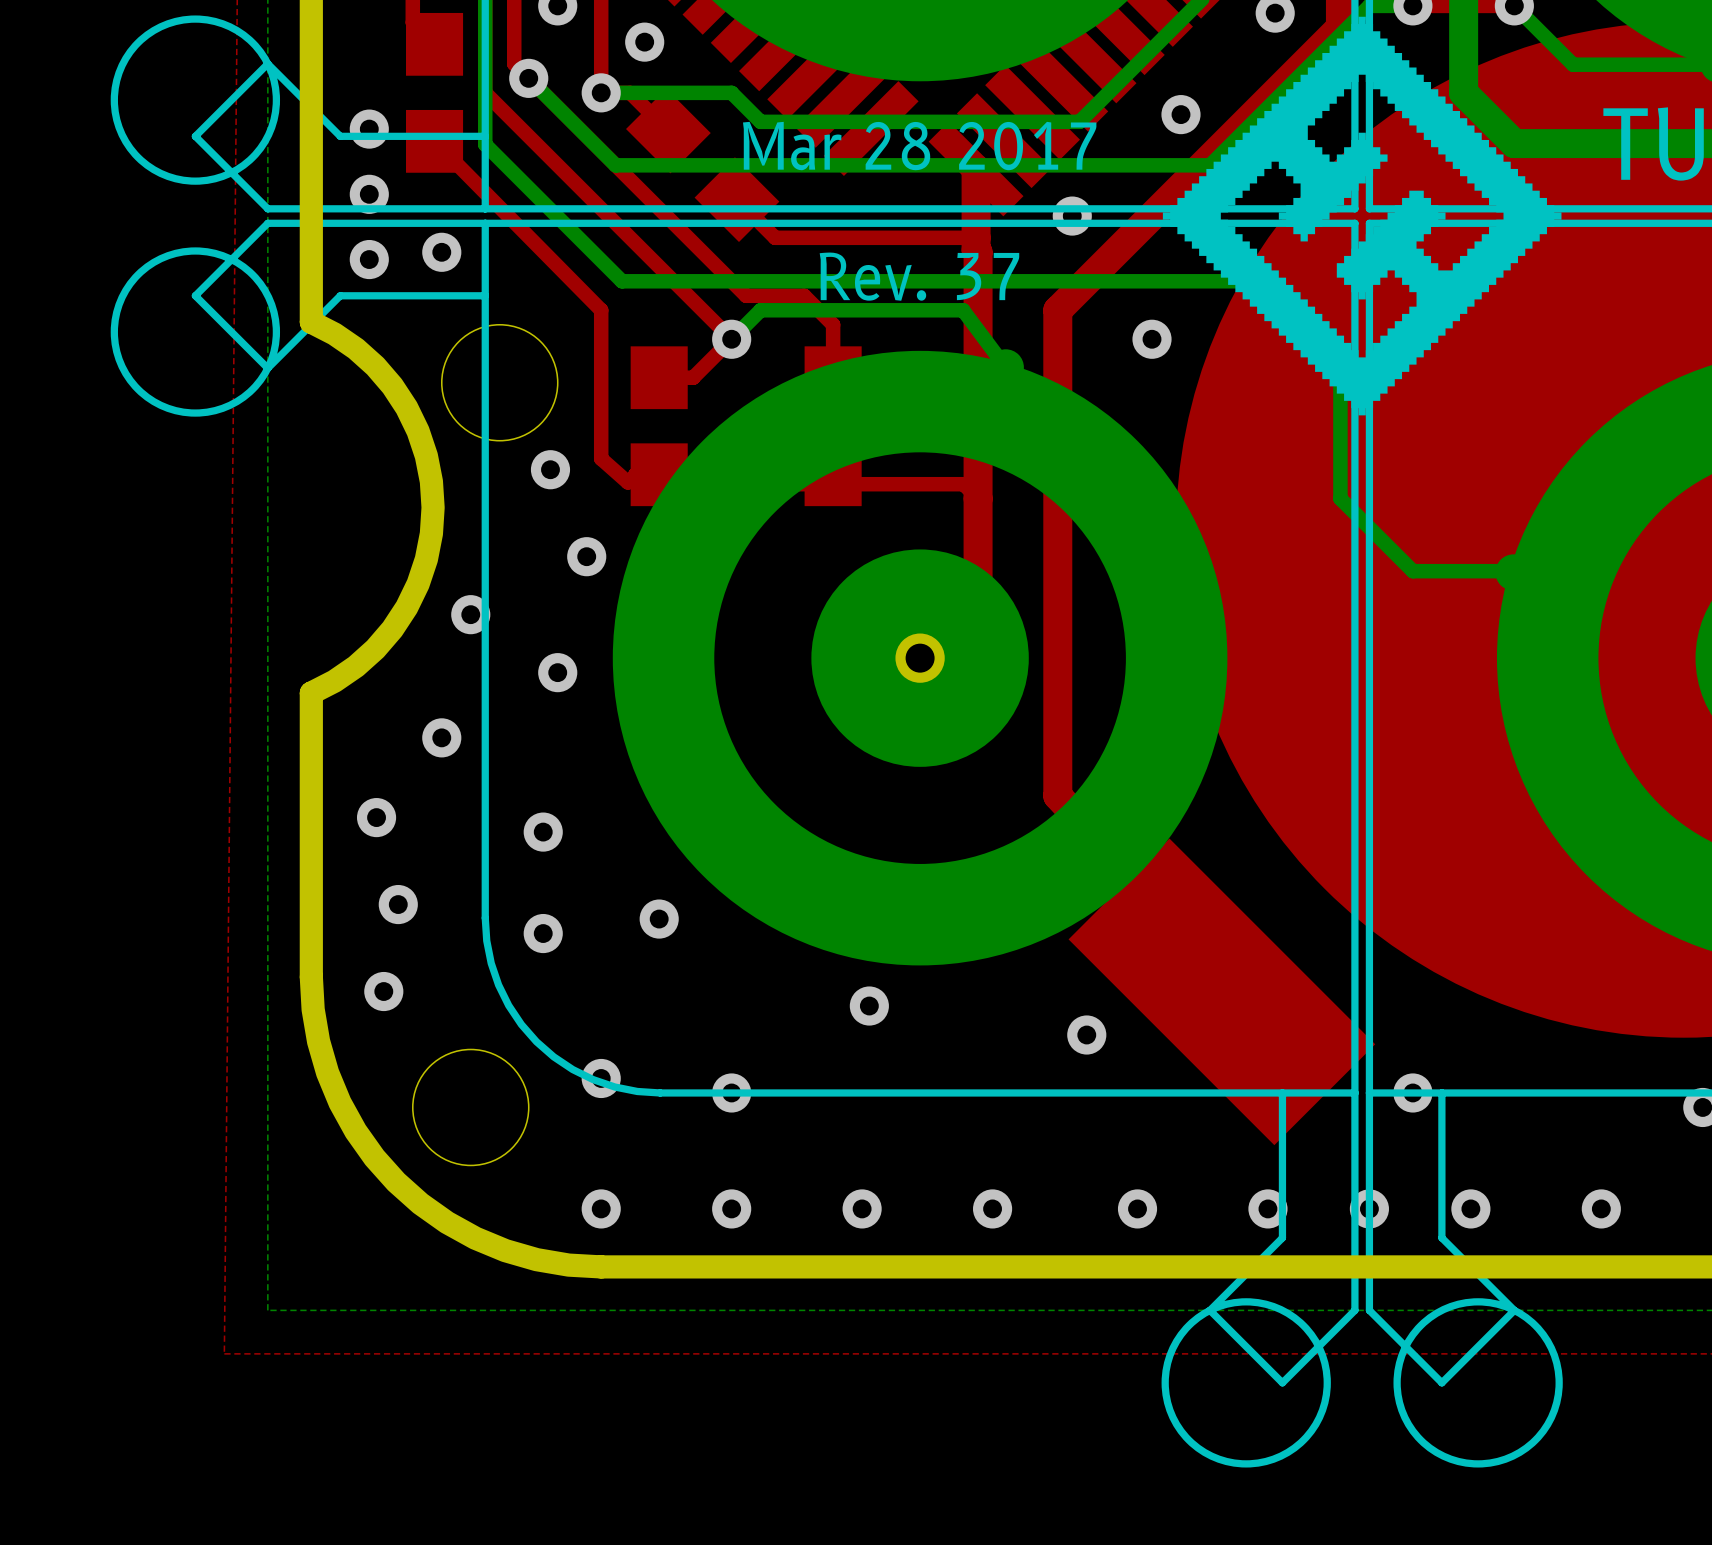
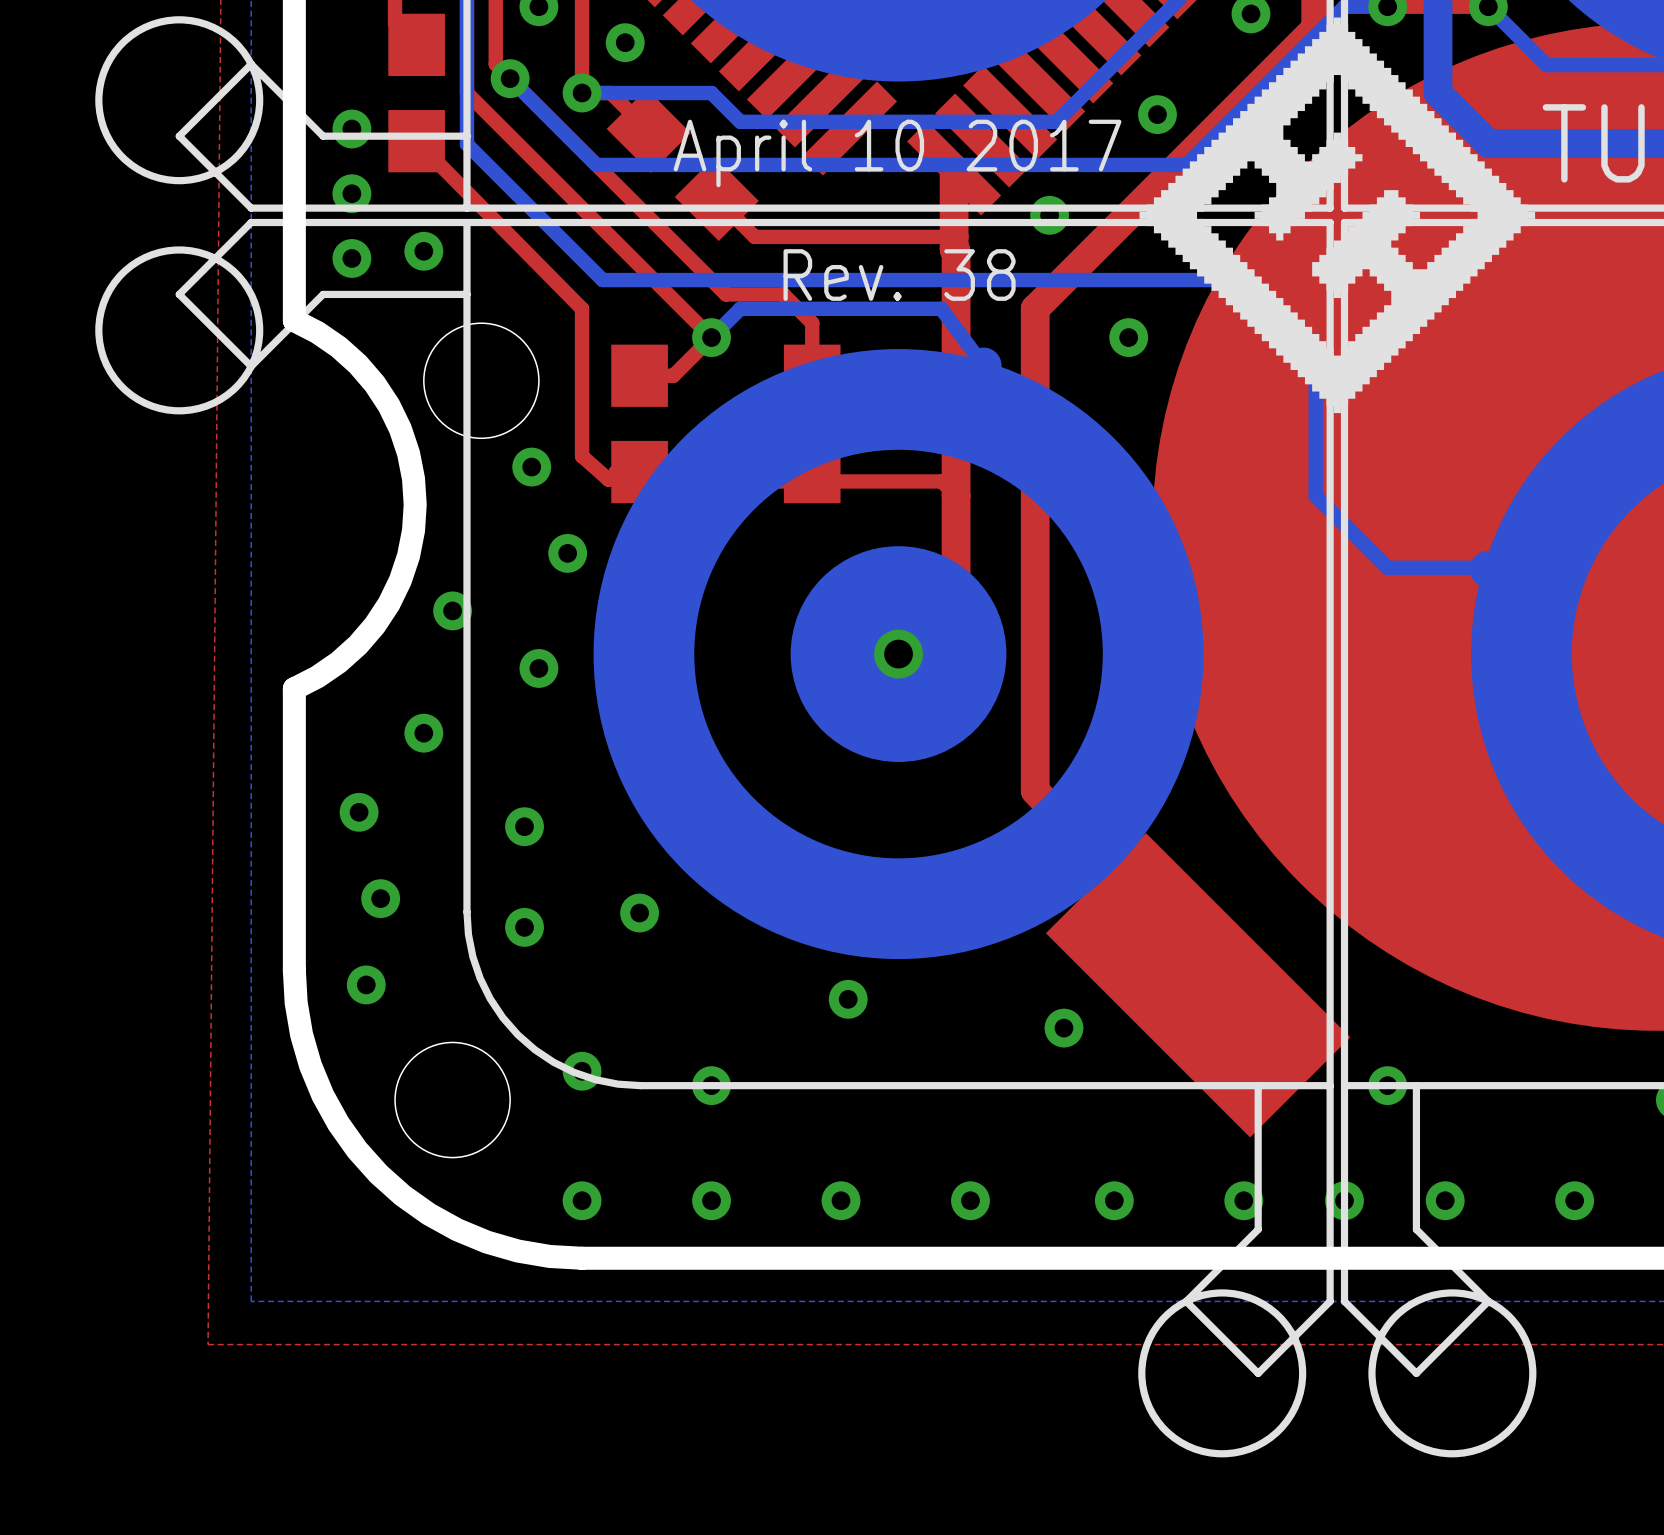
text: Mar 28 2017 (919, 146) -> April 10 2017 (897, 153)
text: Rev. 37 (919, 276) -> Rev. 38 (899, 275)

